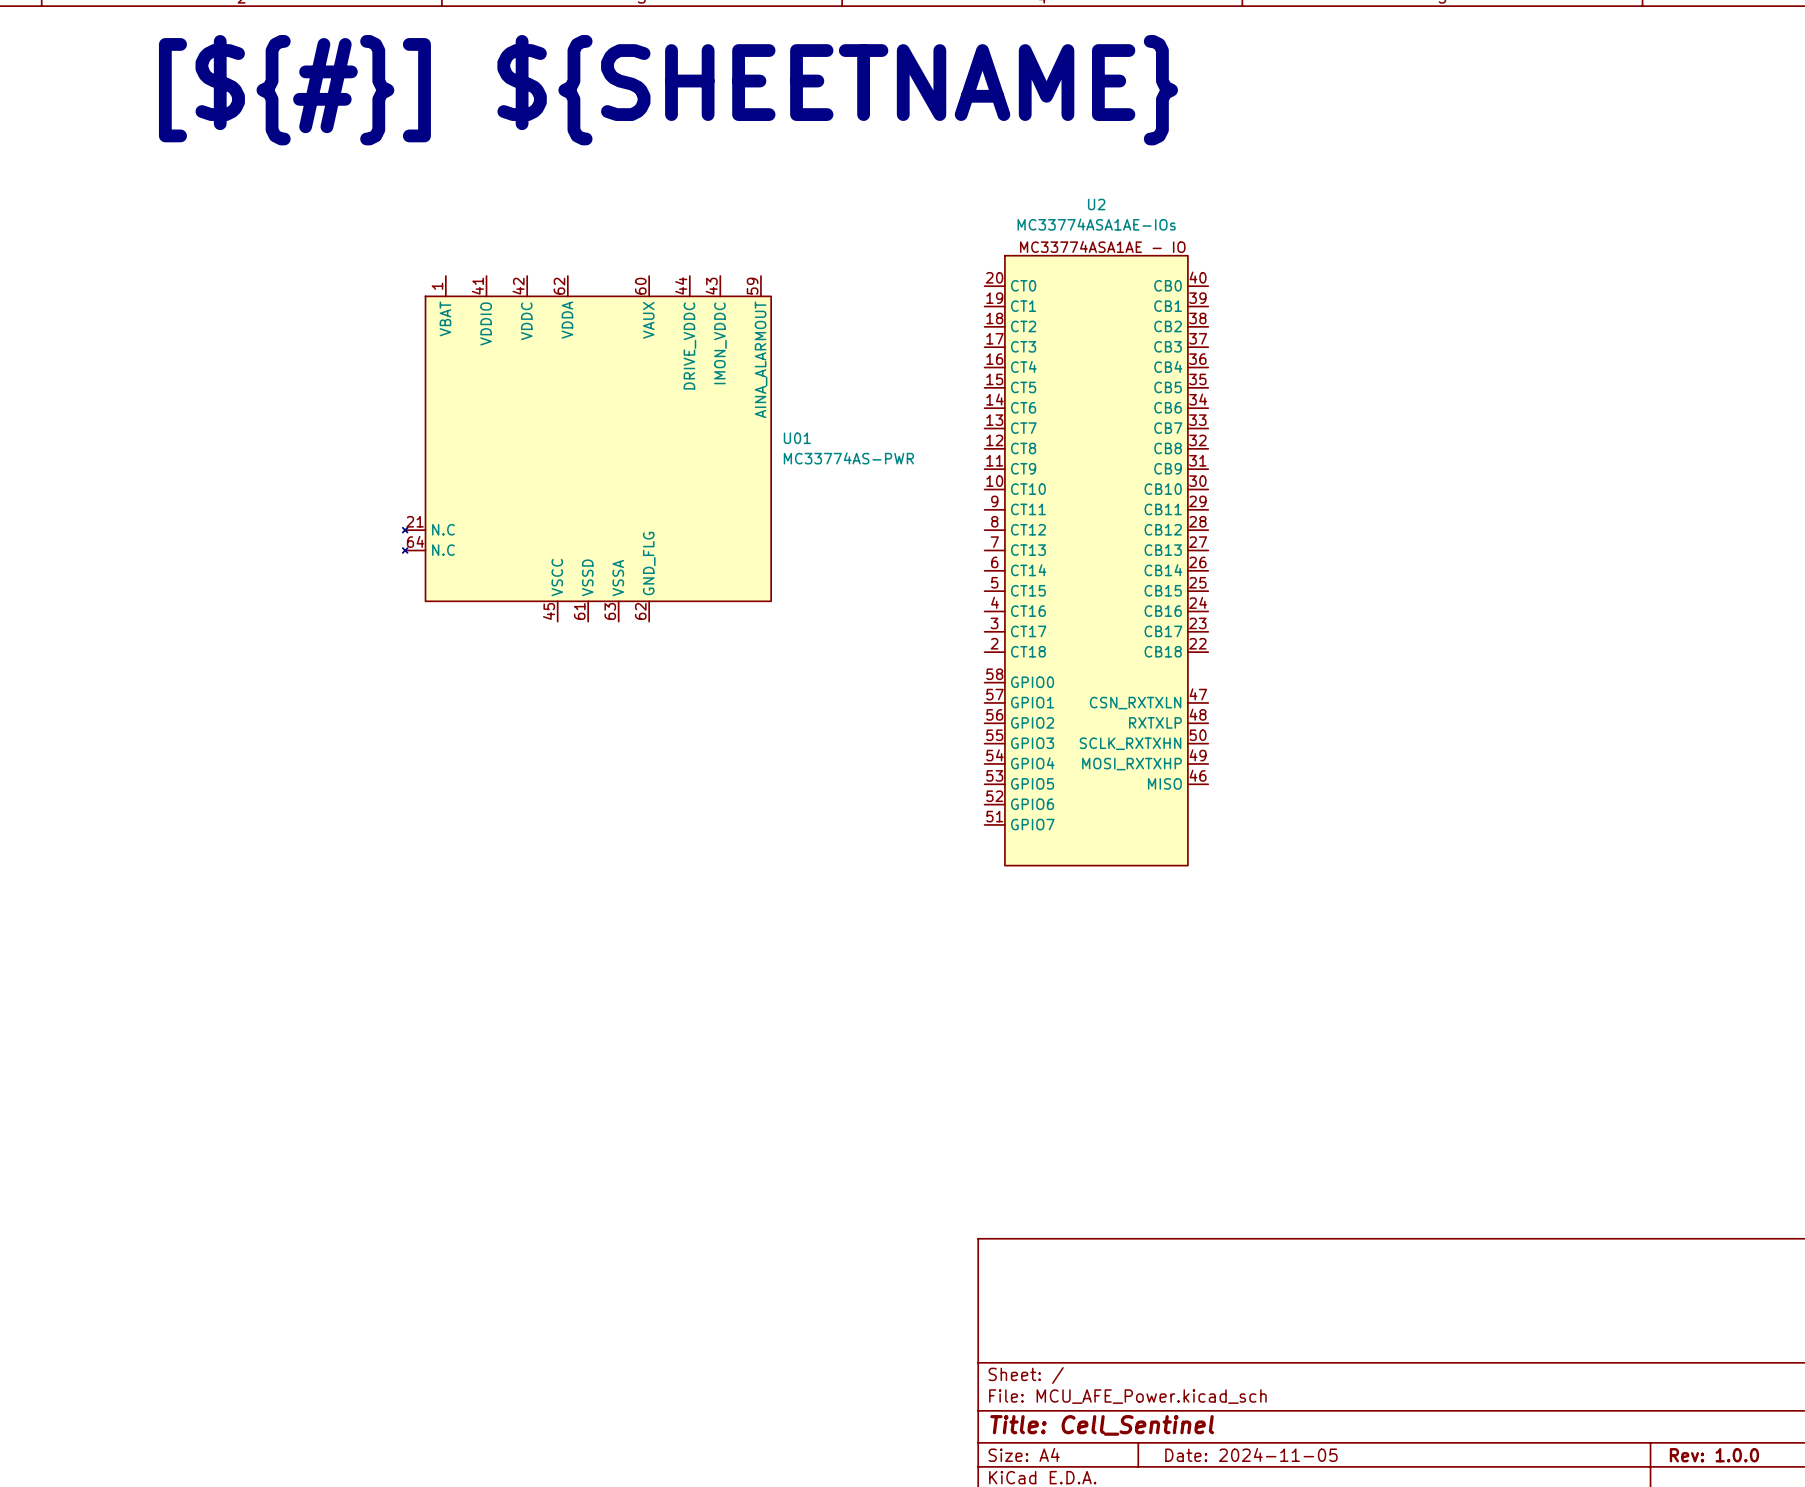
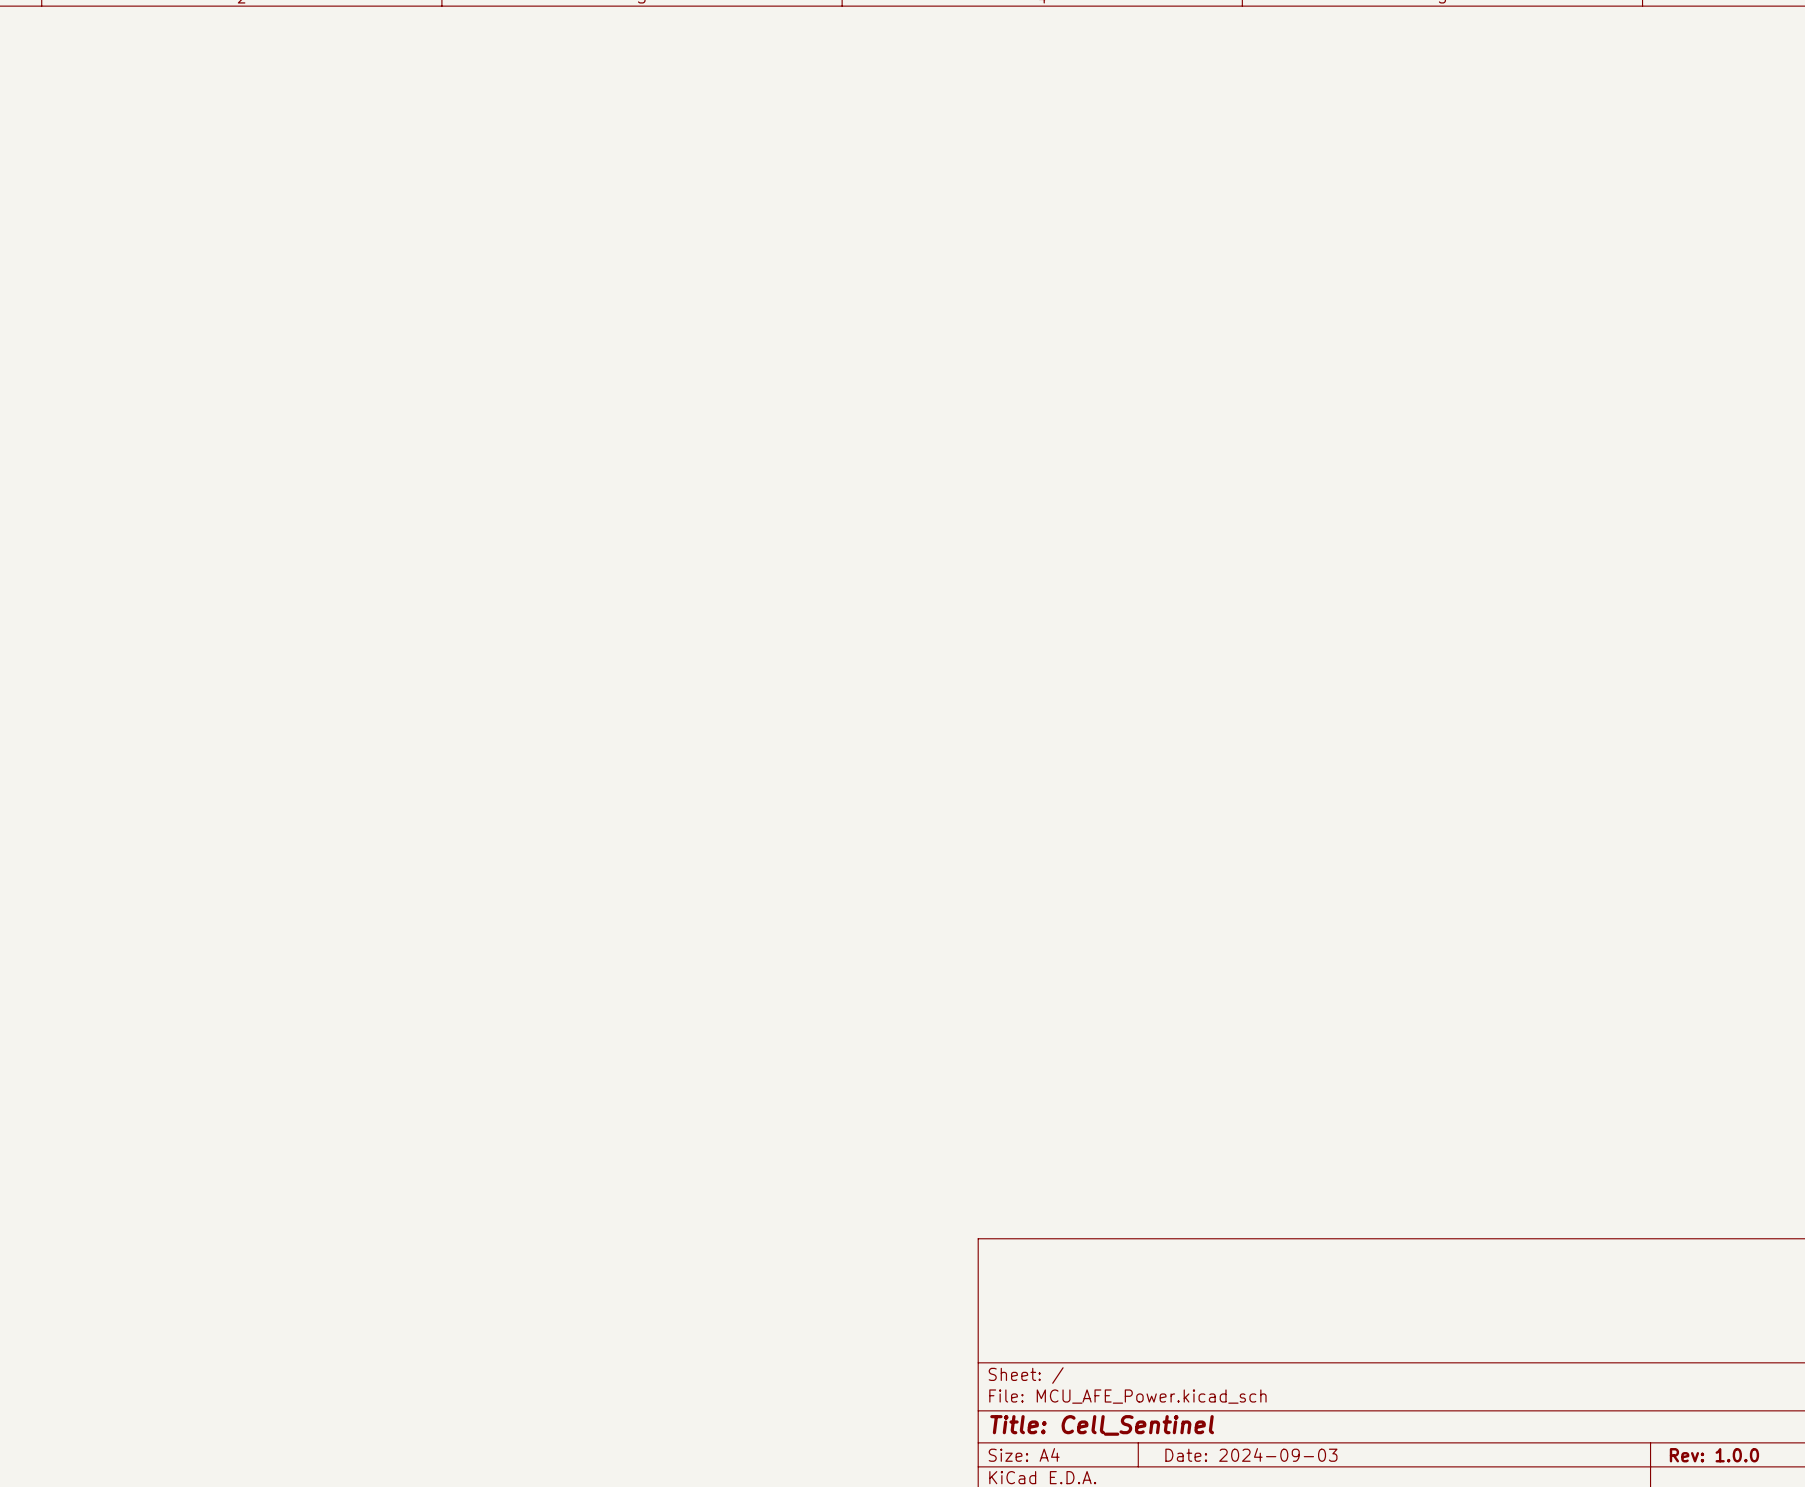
text: [${#}] ${SHEETNAME} (668, 90) -> none
U01: MC33774AS-PWR (586, 448) -> none
U2: MC33774ASA1AE-IOs (1096, 560) -> none
title block: Date: 2024-11-05 (1251, 1454) -> Date: 2024-09-03 (1251, 1454)

